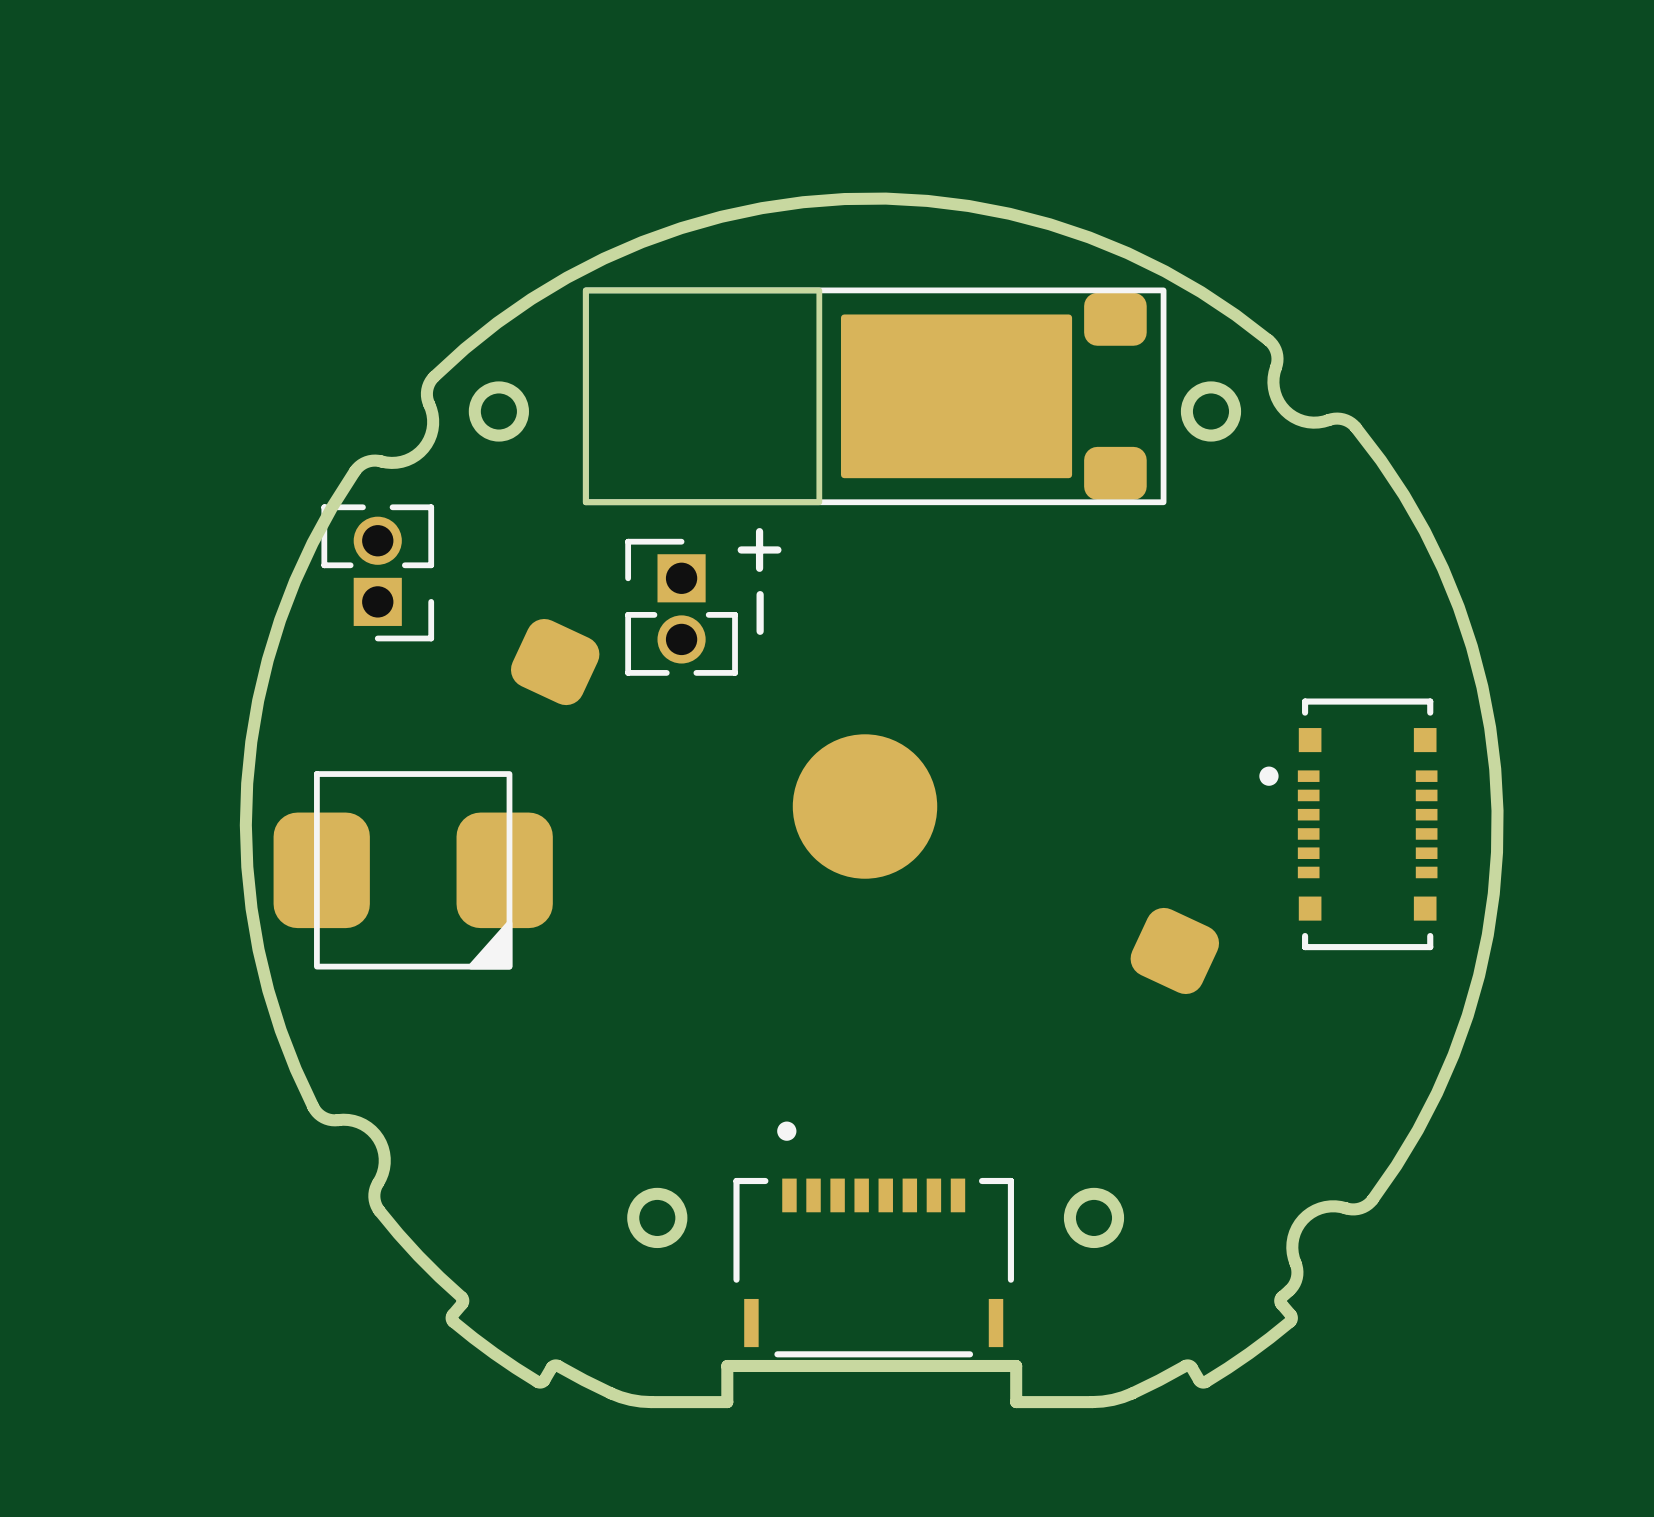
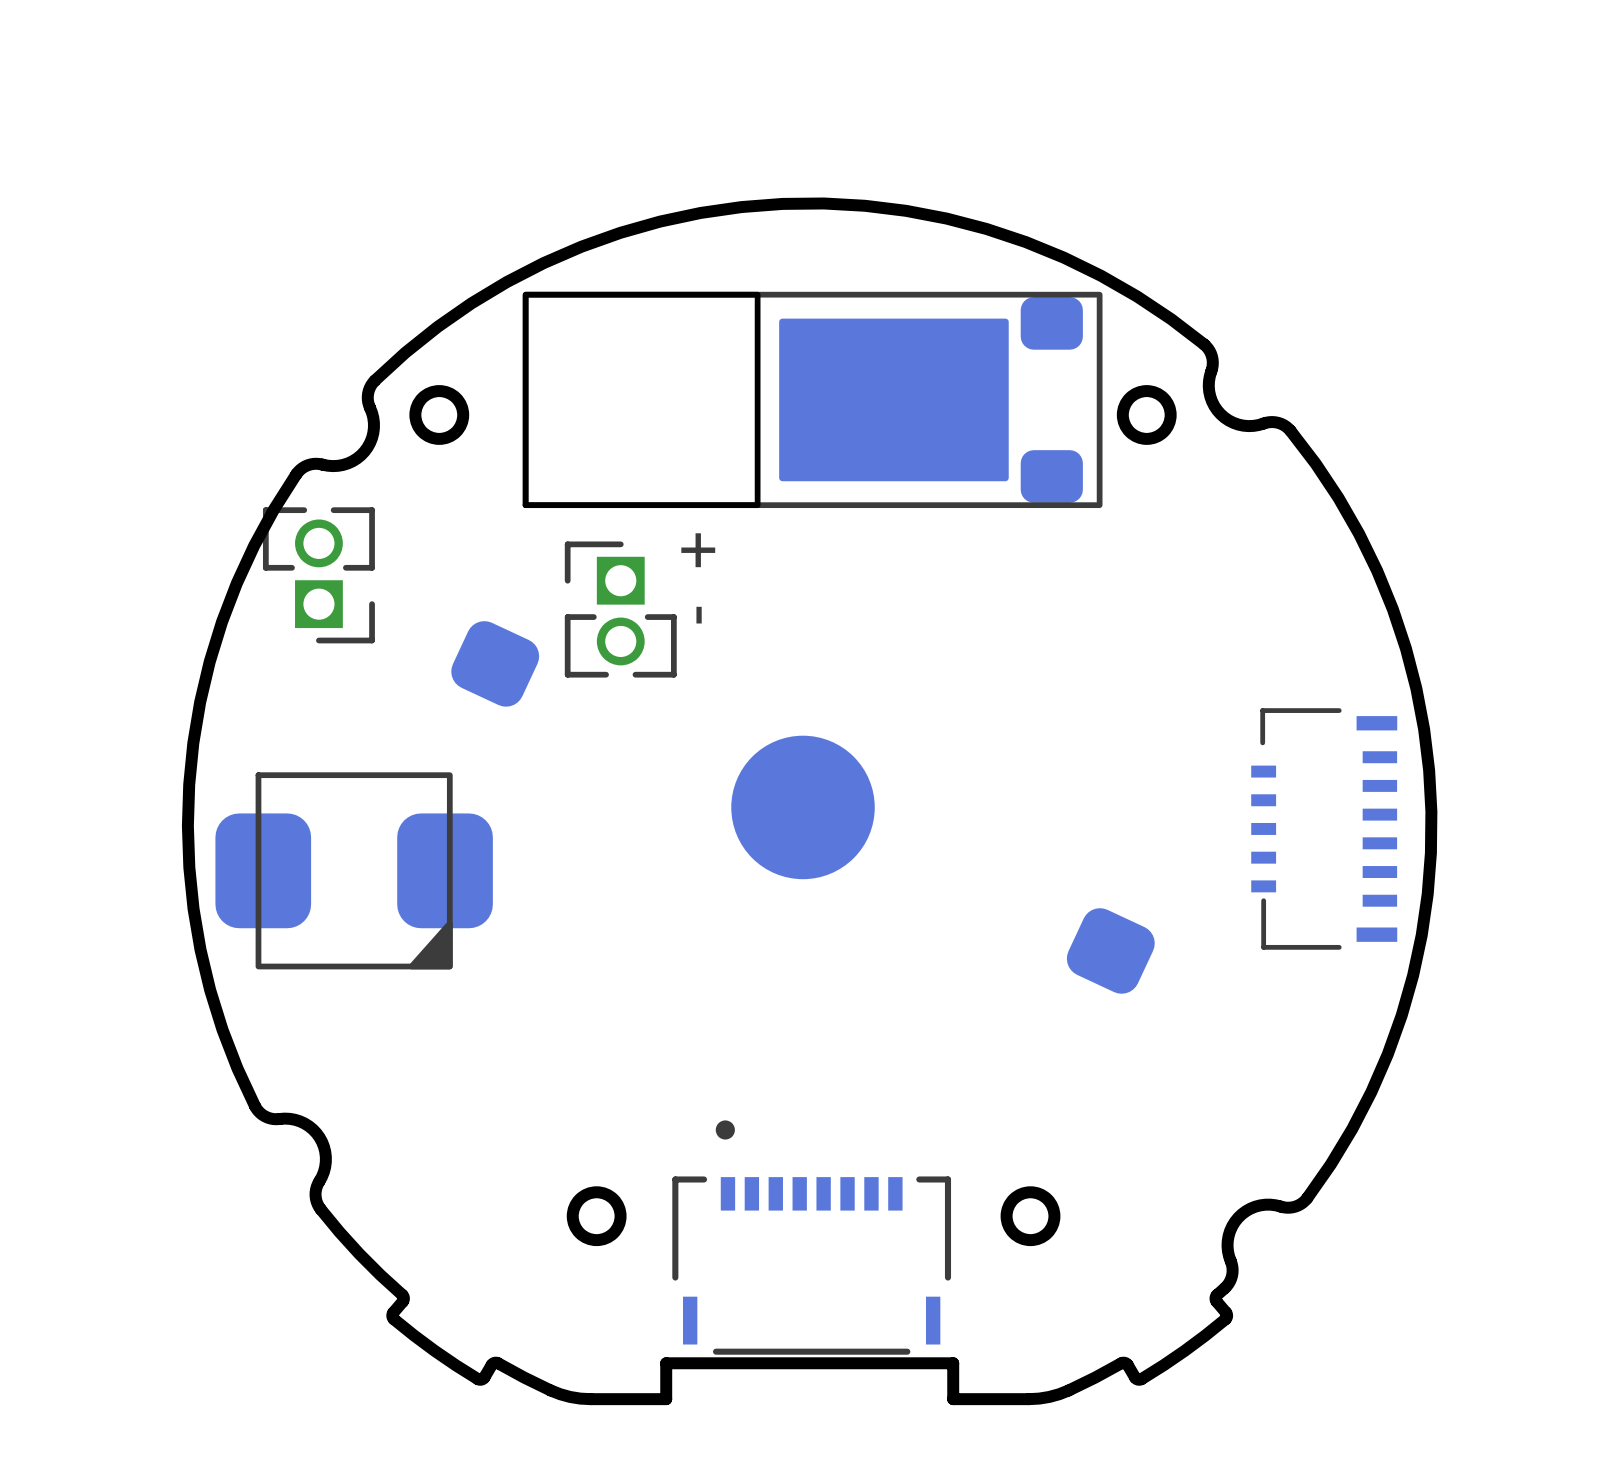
part footprint: [1259, 698, 1438, 951] -> [1251, 708, 1398, 950]

